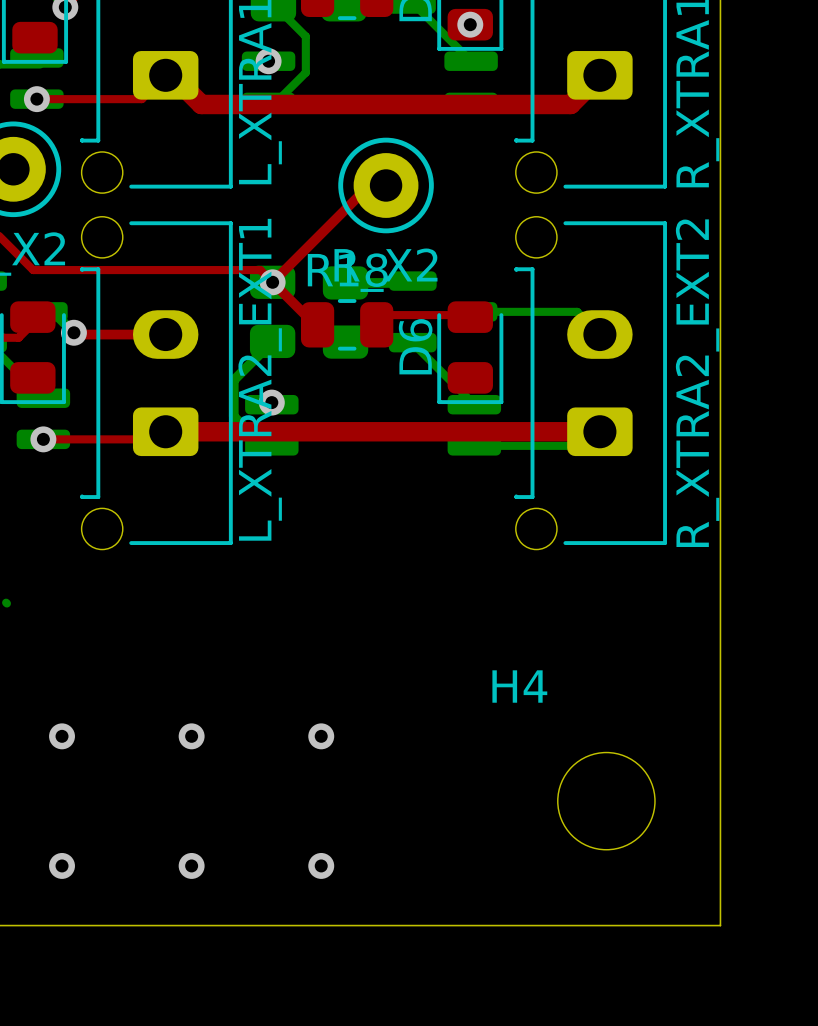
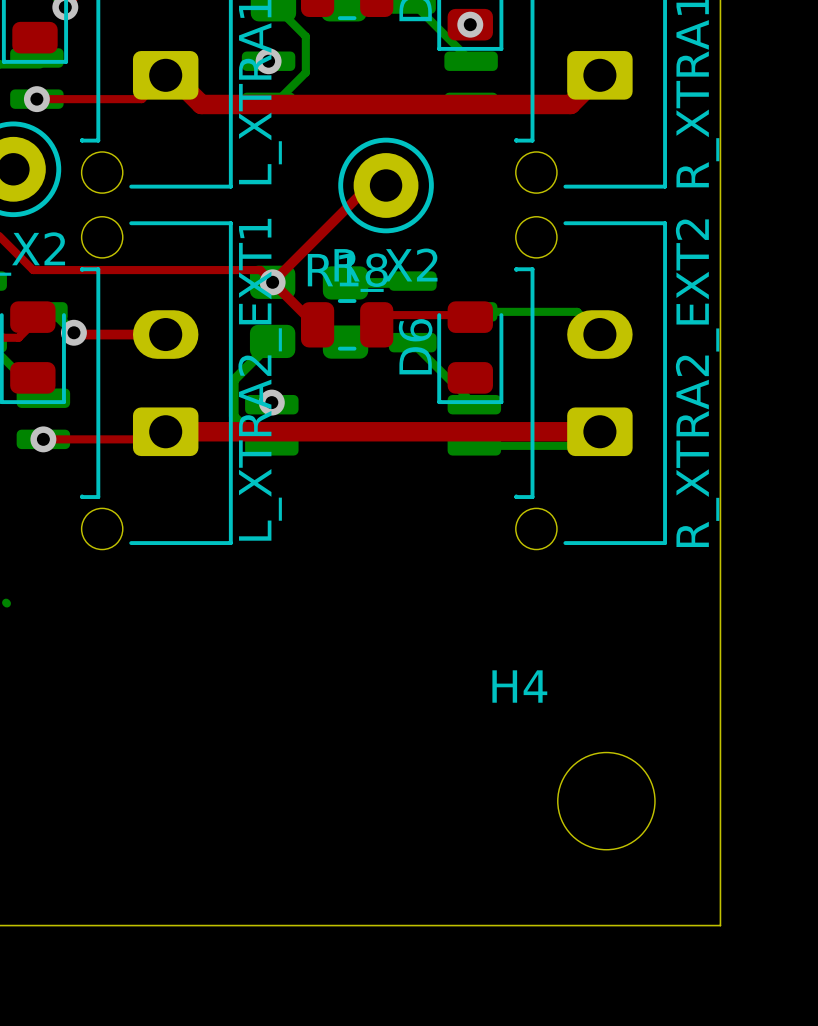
via: (62, 736) -> none
via: (191, 736) -> none
via: (321, 736) -> none
via: (62, 865) -> none
via: (191, 865) -> none
via: (321, 865) -> none

